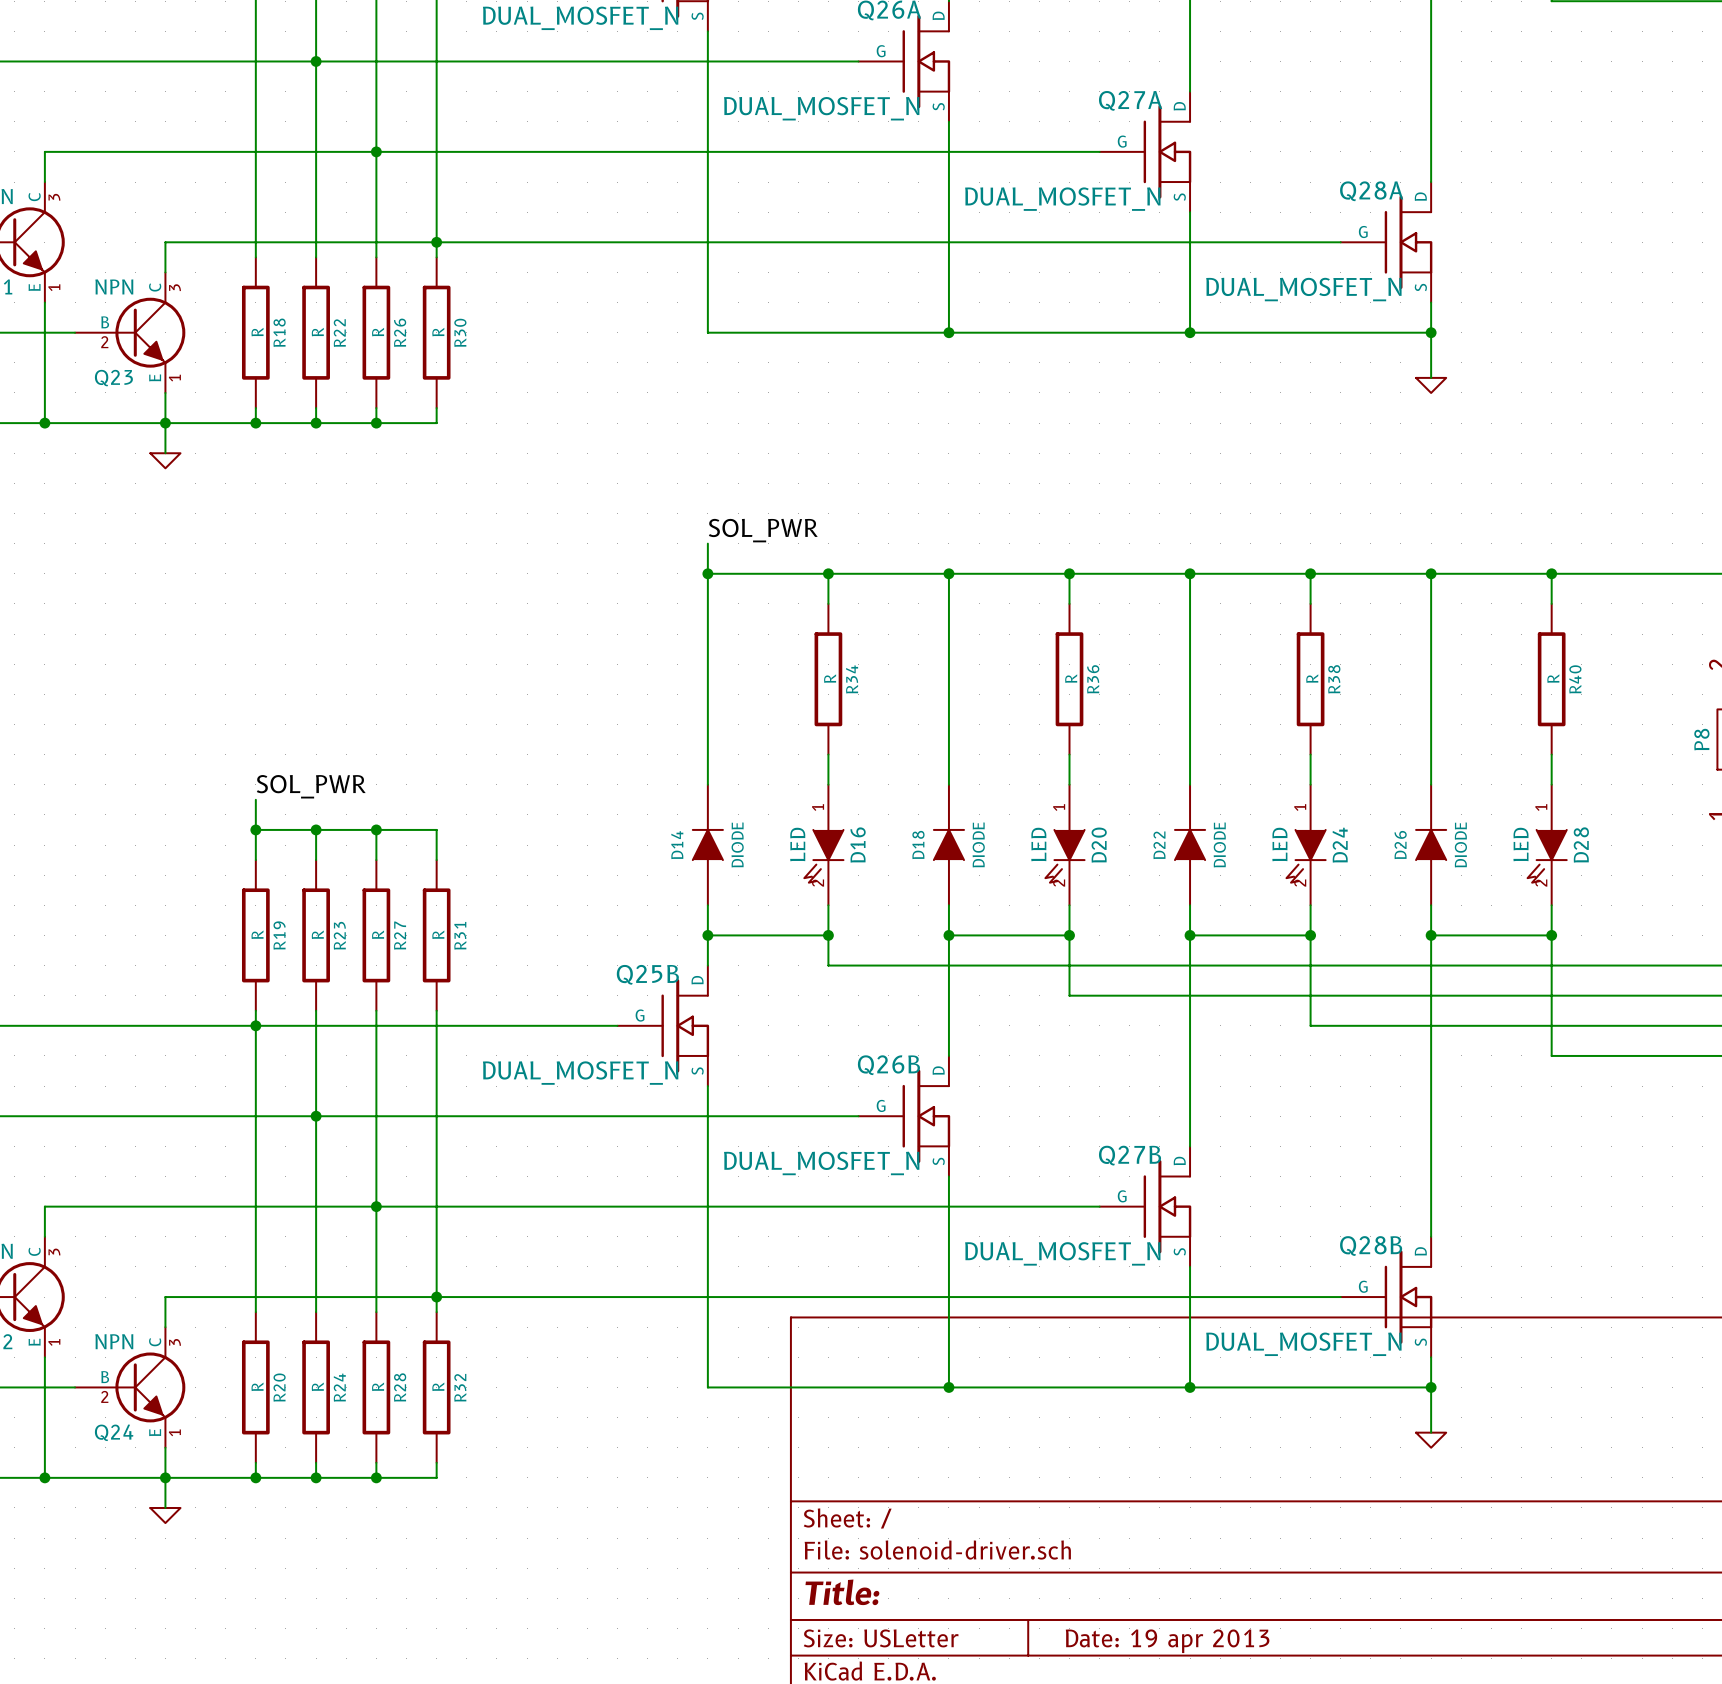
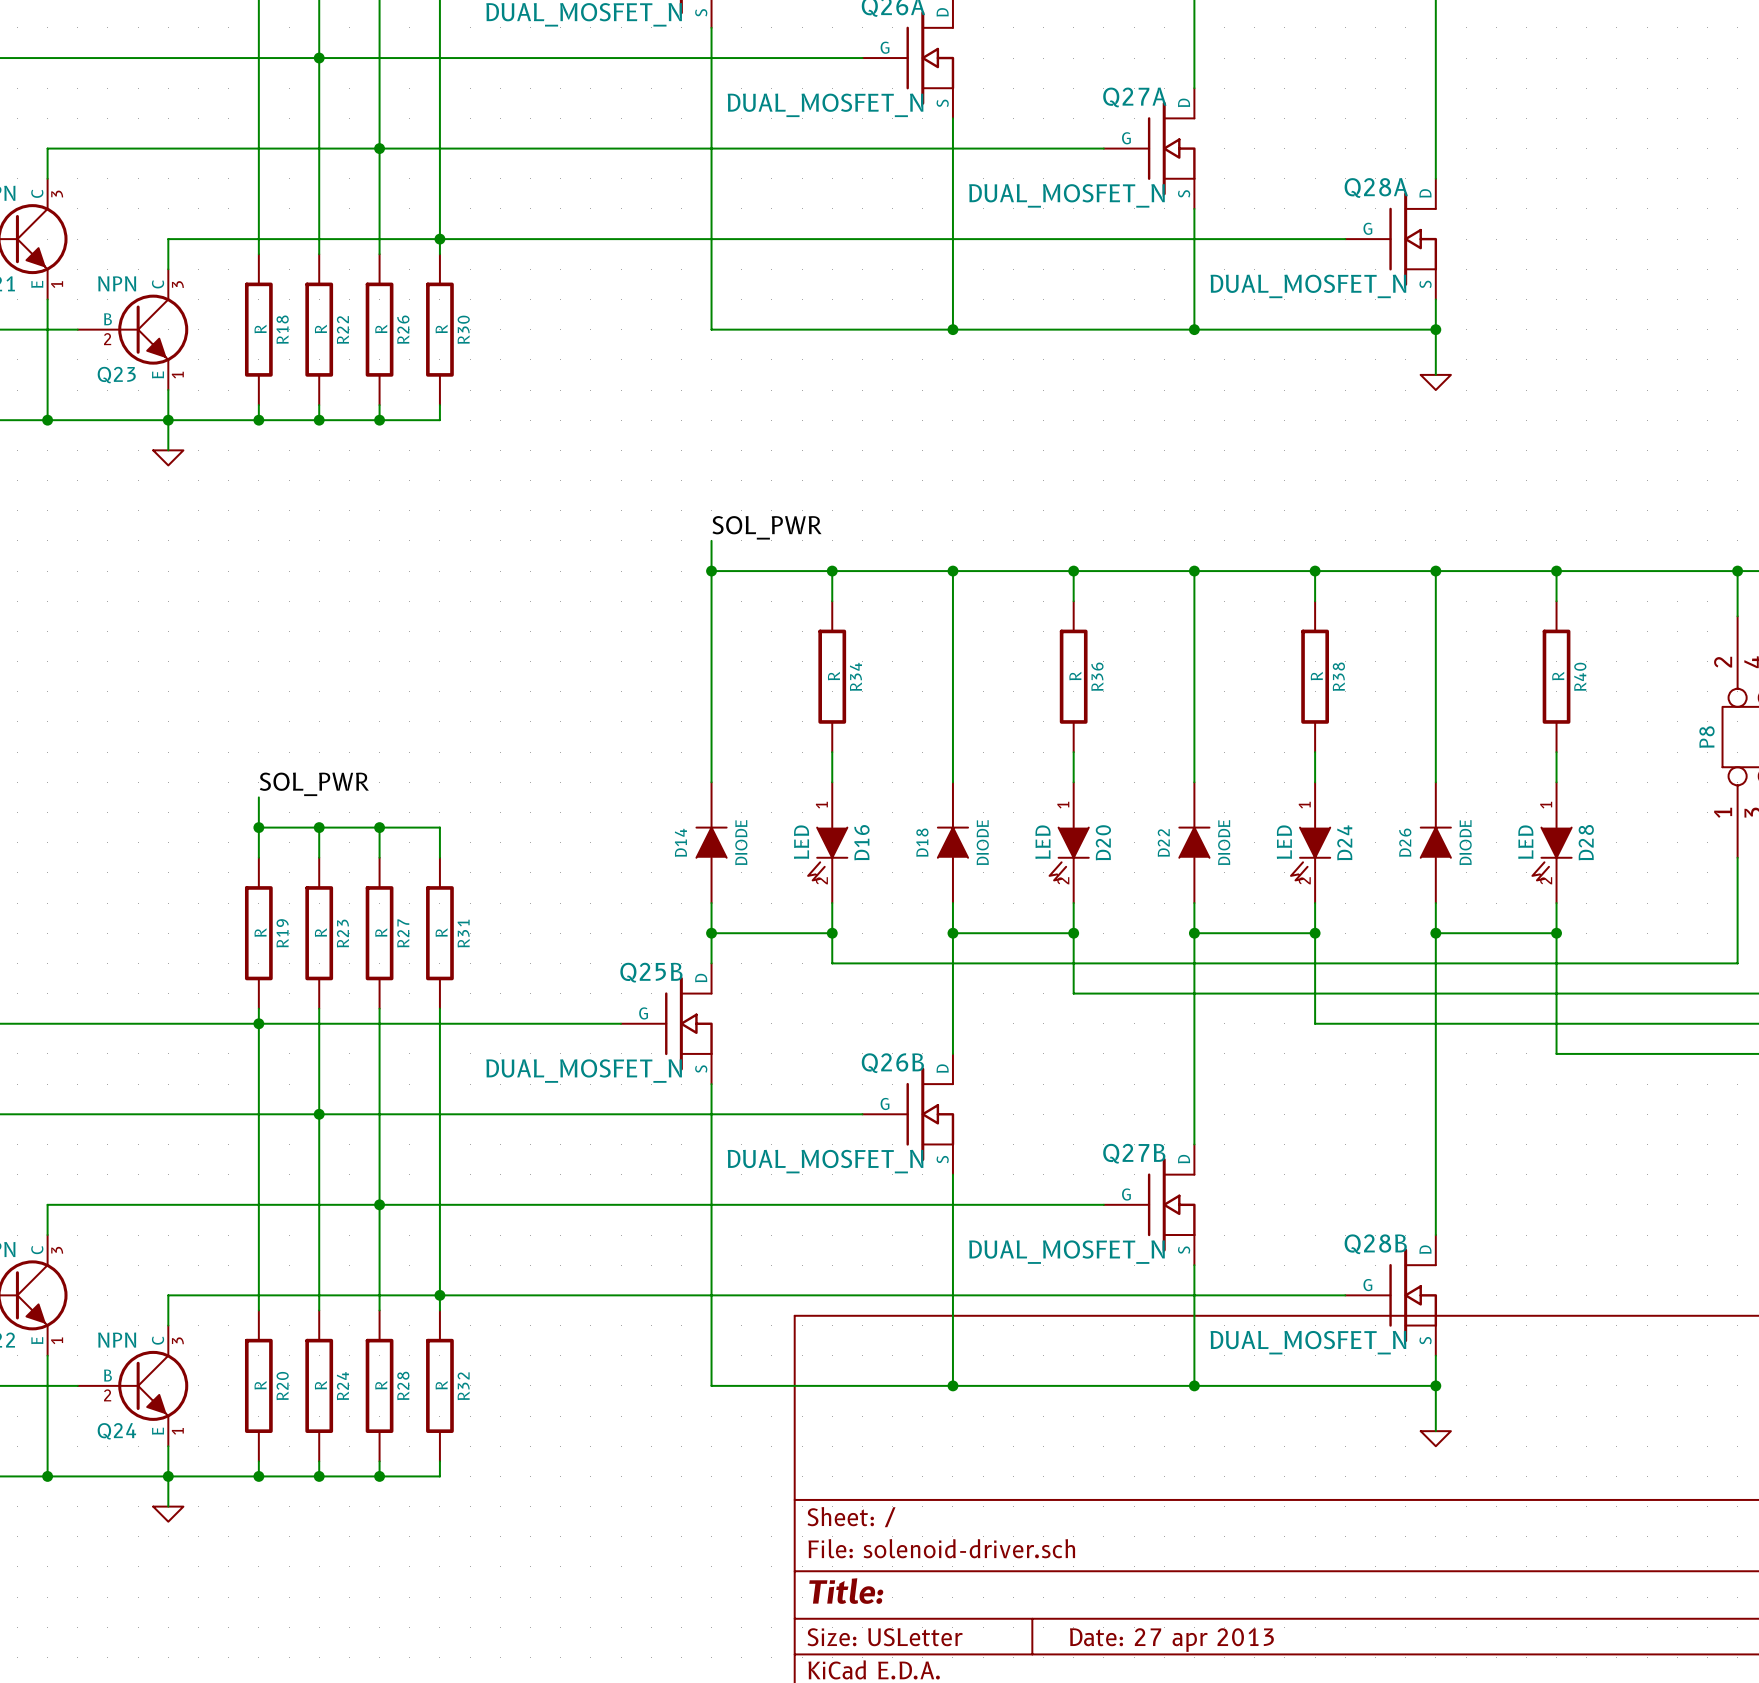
title block: Date: 19 apr 2013 (1167, 1641) -> Date: 27 apr 2013 (1171, 1640)

